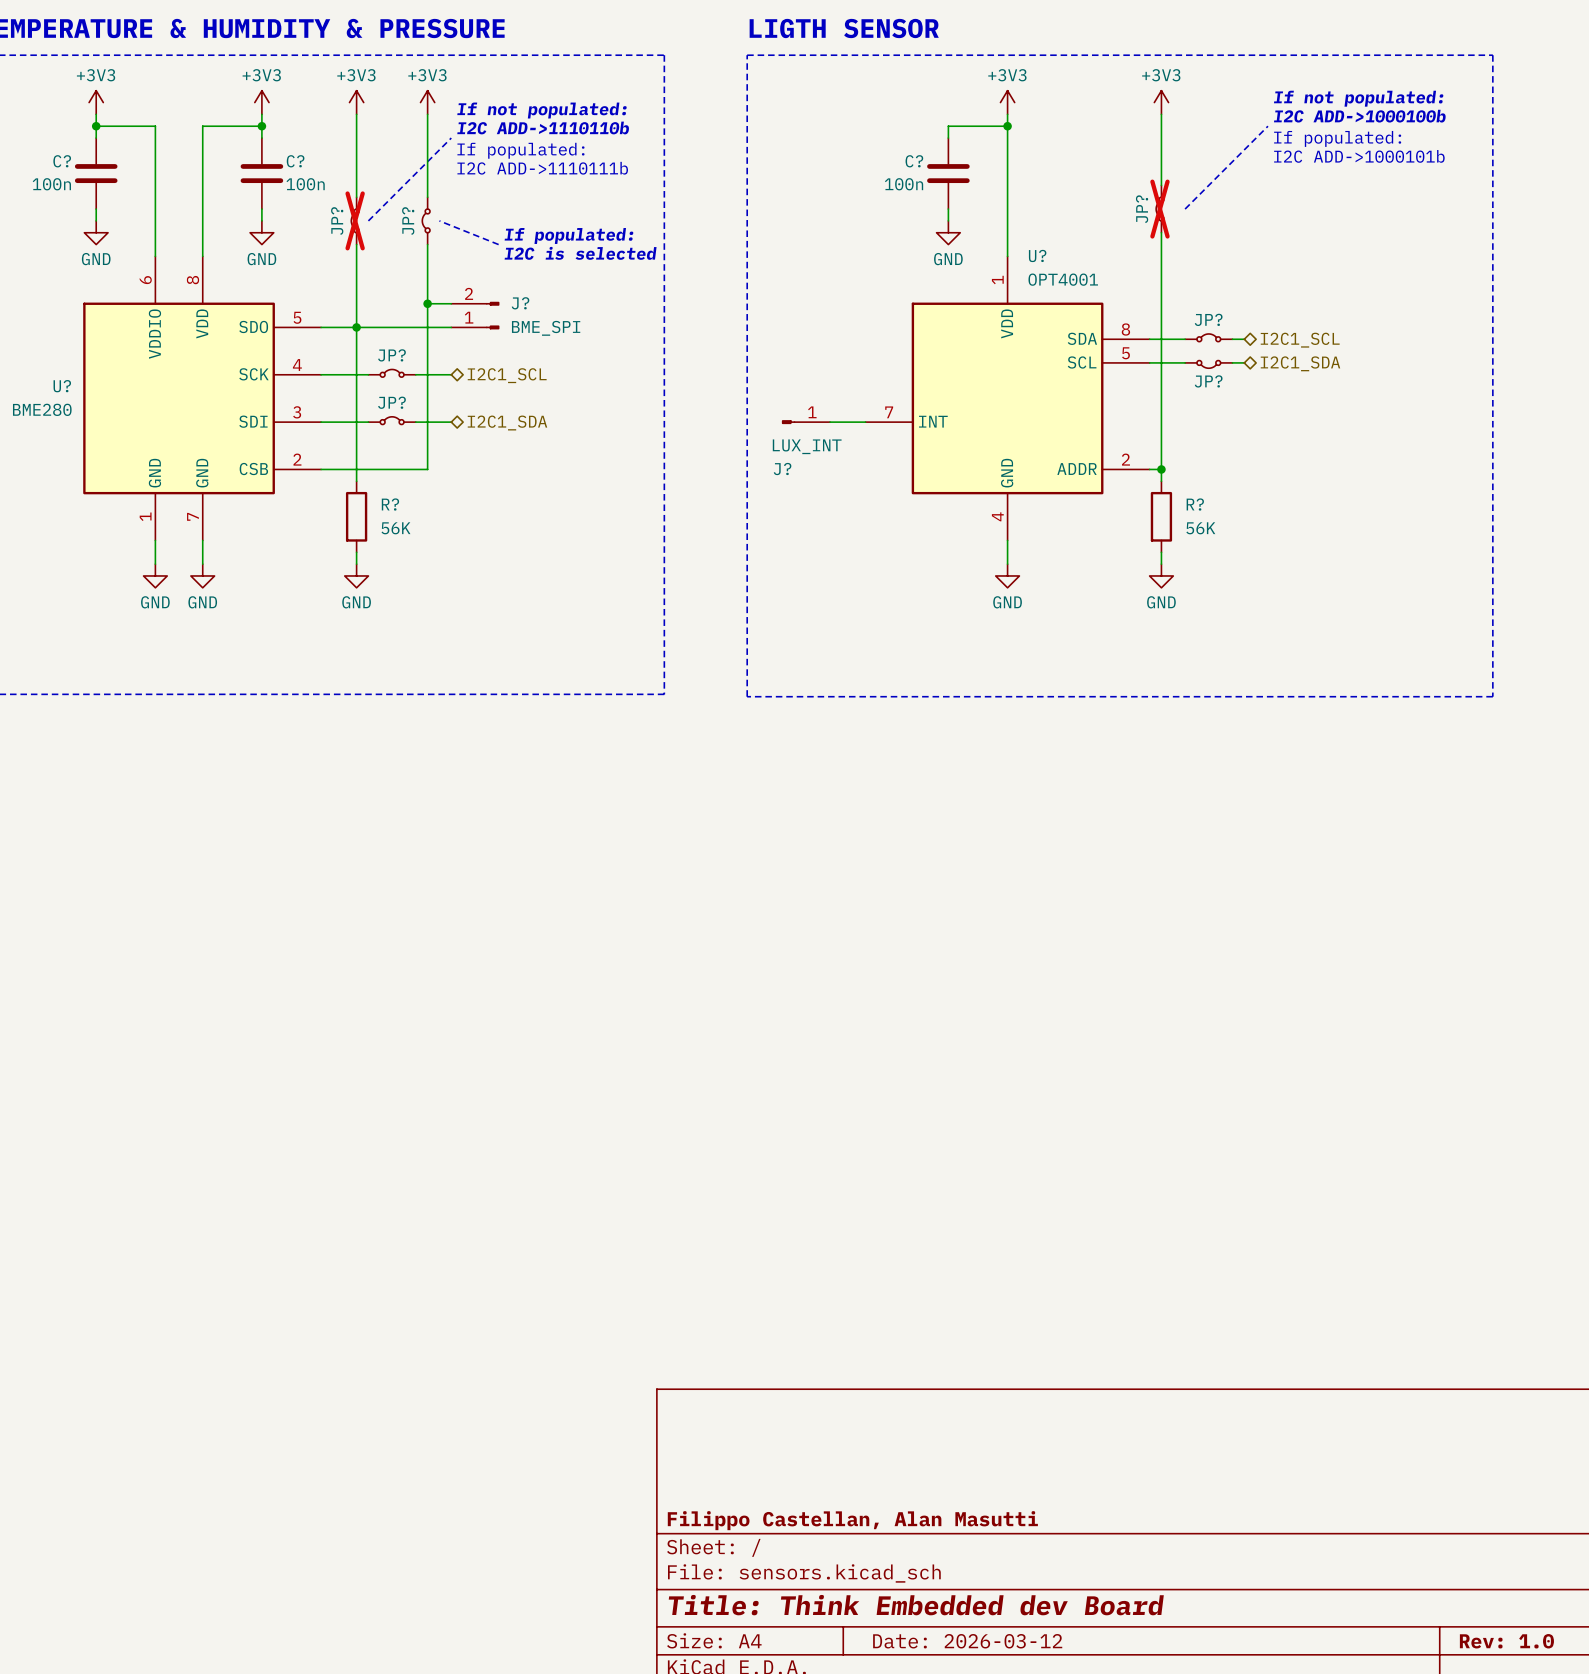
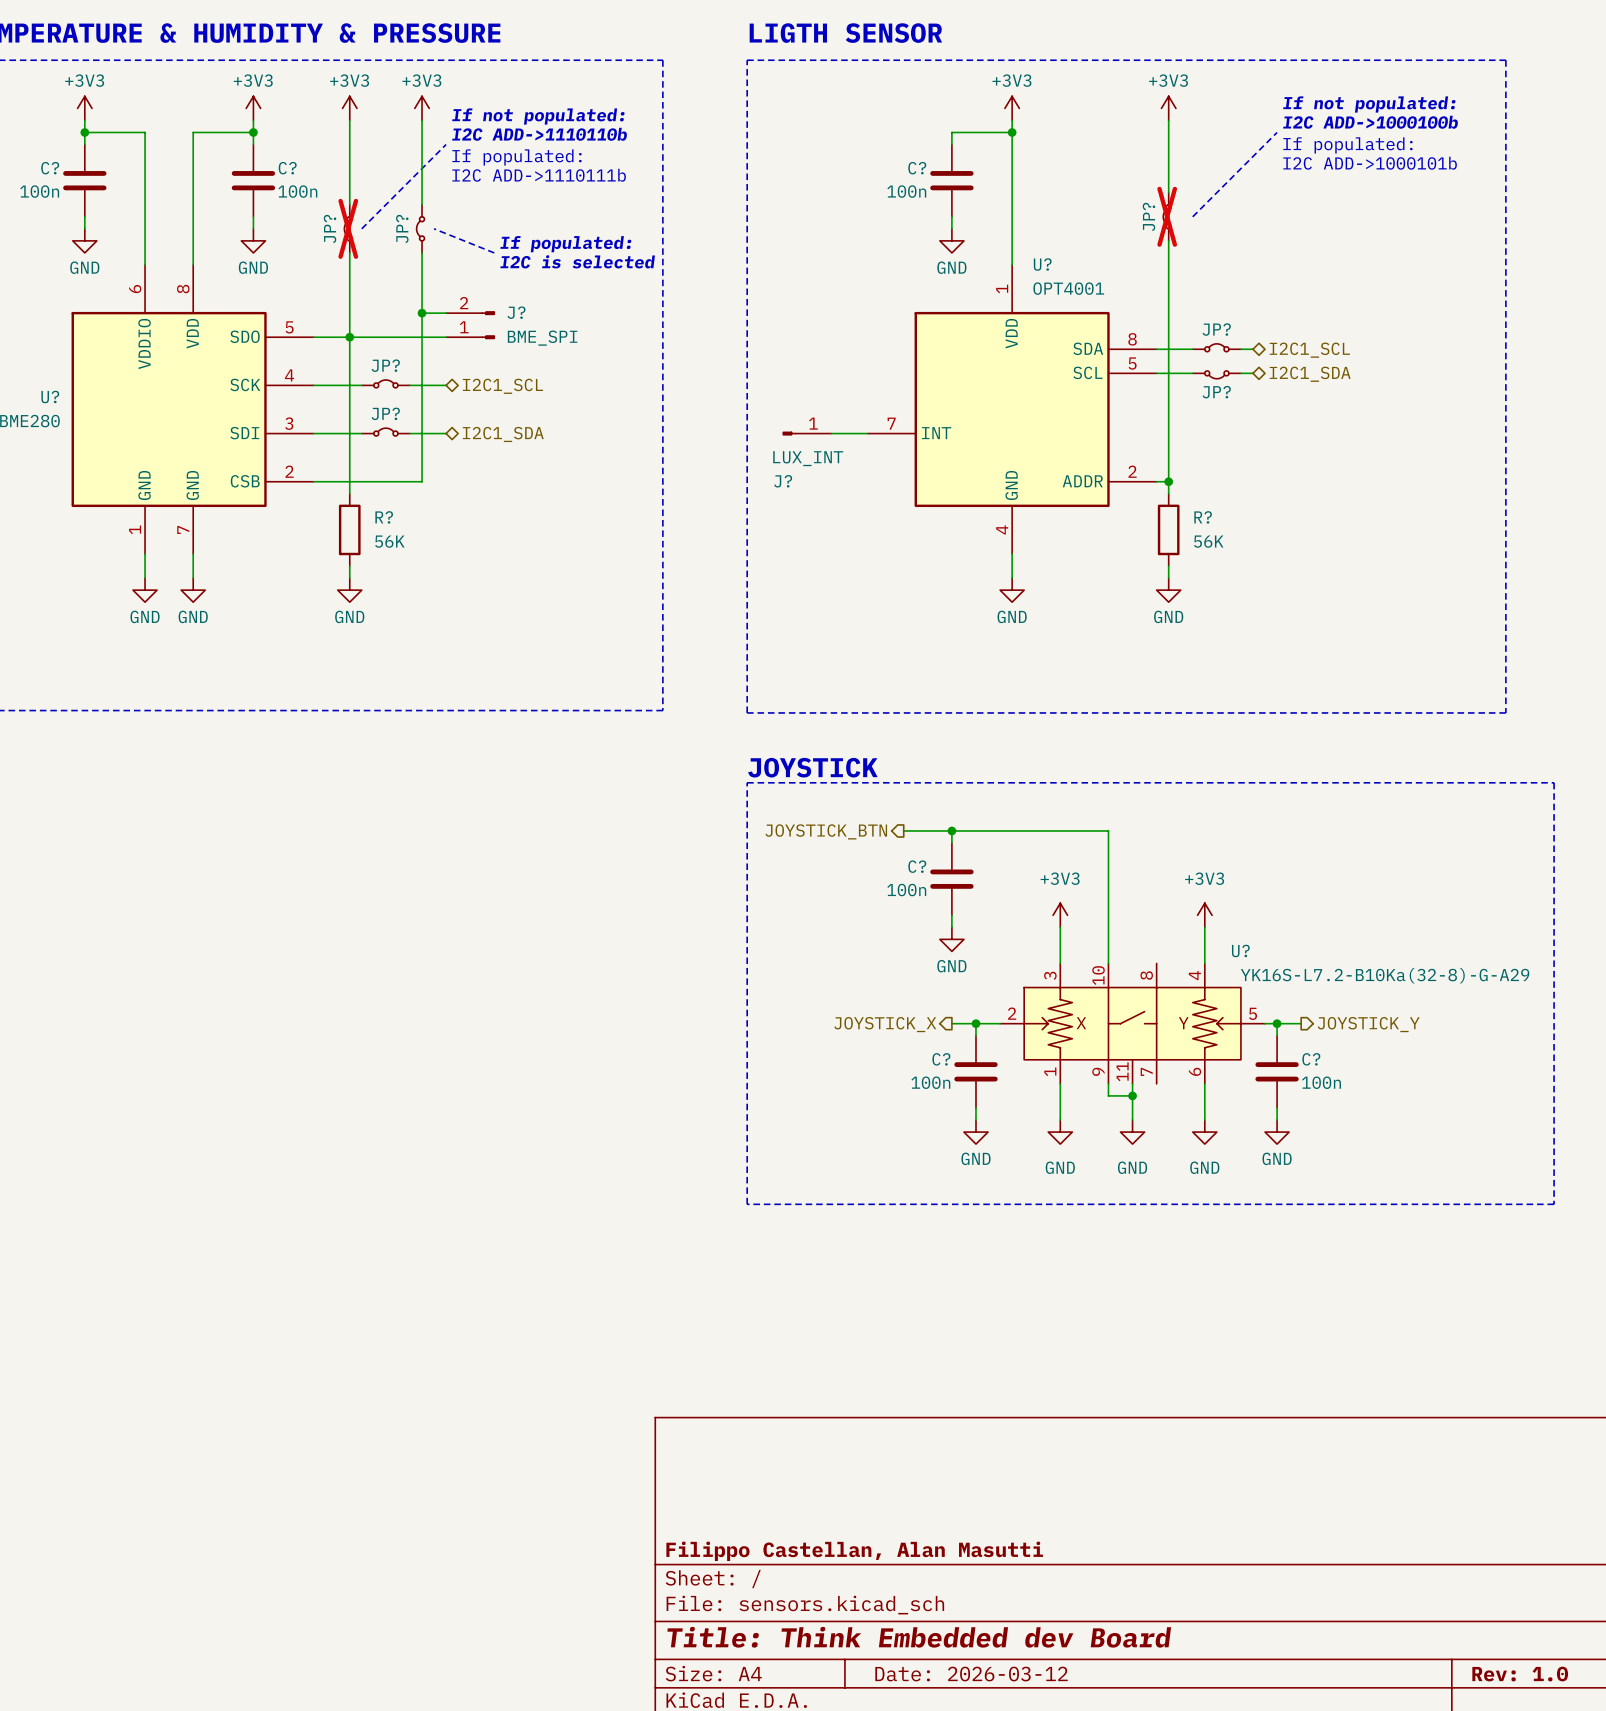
text: none -> JOYSTICK (812, 767)
line: none -> (747, 782) (1554, 782) (1554, 1204) (747, 1204) (747, 782)
wire: none -> (903, 830) (1108, 830) (1108, 963)
wire: none -> (951, 830) (951, 843)
junction: none -> (951, 830)
hierarchical label: none -> JOYSTICK_BTN (826, 831)
C?: none -> 100n (951, 879)
wire: none -> (951, 915) (951, 927)
power symbol: none -> +3V3 (1060, 915)
power symbol: none -> +3V3 (1204, 915)
wire: none -> (1060, 927) (1060, 963)
wire: none -> (1204, 927) (1204, 963)
power symbol: none -> GND (951, 939)
hierarchical label: none -> JOYSTICK_X (885, 1024)
wire: none -> (951, 1023) (1000, 1023)
wire: none -> (975, 1023) (975, 1035)
junction: none -> (975, 1023)
U?: none -> YK16S-L7.2-B10Ka(32-8)-G-A29 (1132, 1023)
wire: none -> (1265, 1023) (1301, 1023)
wire: none -> (1277, 1023) (1277, 1035)
junction: none -> (1277, 1023)
hierarchical label: none -> JOYSTICK_Y (1368, 1024)
C?: none -> 100n (975, 1071)
C?: none -> 100n (1277, 1071)
wire: none -> (1060, 1083) (1060, 1120)
wire: none -> (1108, 1083) (1108, 1095) (1132, 1095)
wire: none -> (1132, 1083) (1132, 1120)
wire: none -> (1204, 1083) (1204, 1120)
junction: none -> (1132, 1095)
wire: none -> (975, 1107) (975, 1120)
wire: none -> (1277, 1107) (1277, 1120)
power symbol: none -> GND (975, 1132)
power symbol: none -> GND (1060, 1132)
power symbol: none -> GND (1132, 1132)
power symbol: none -> GND (1204, 1132)
power symbol: none -> GND (1277, 1132)

